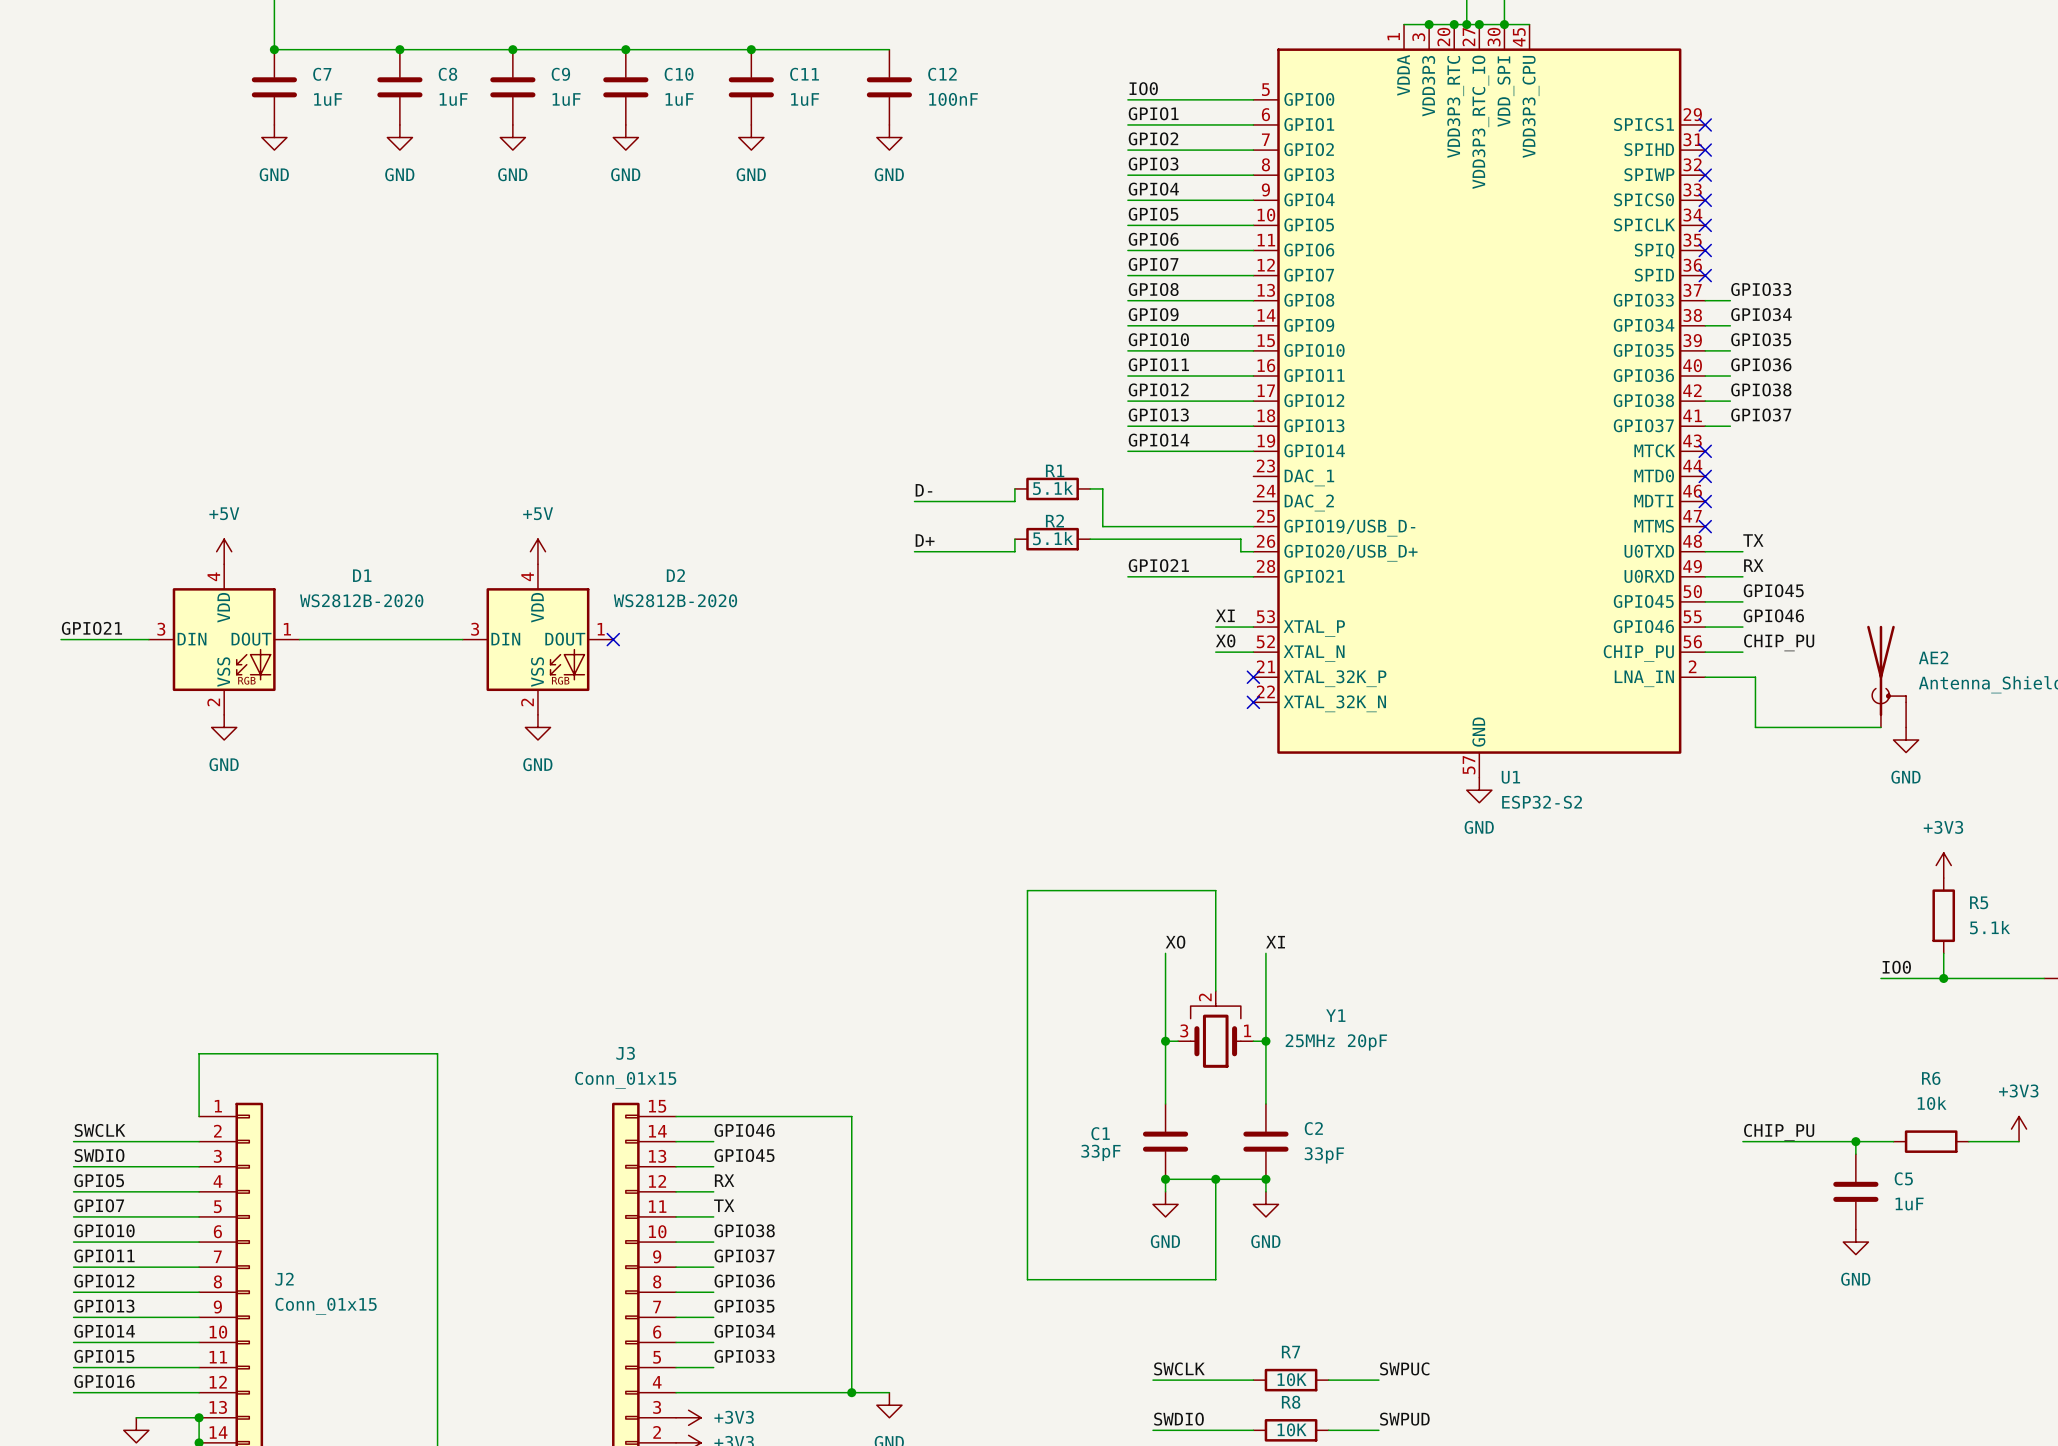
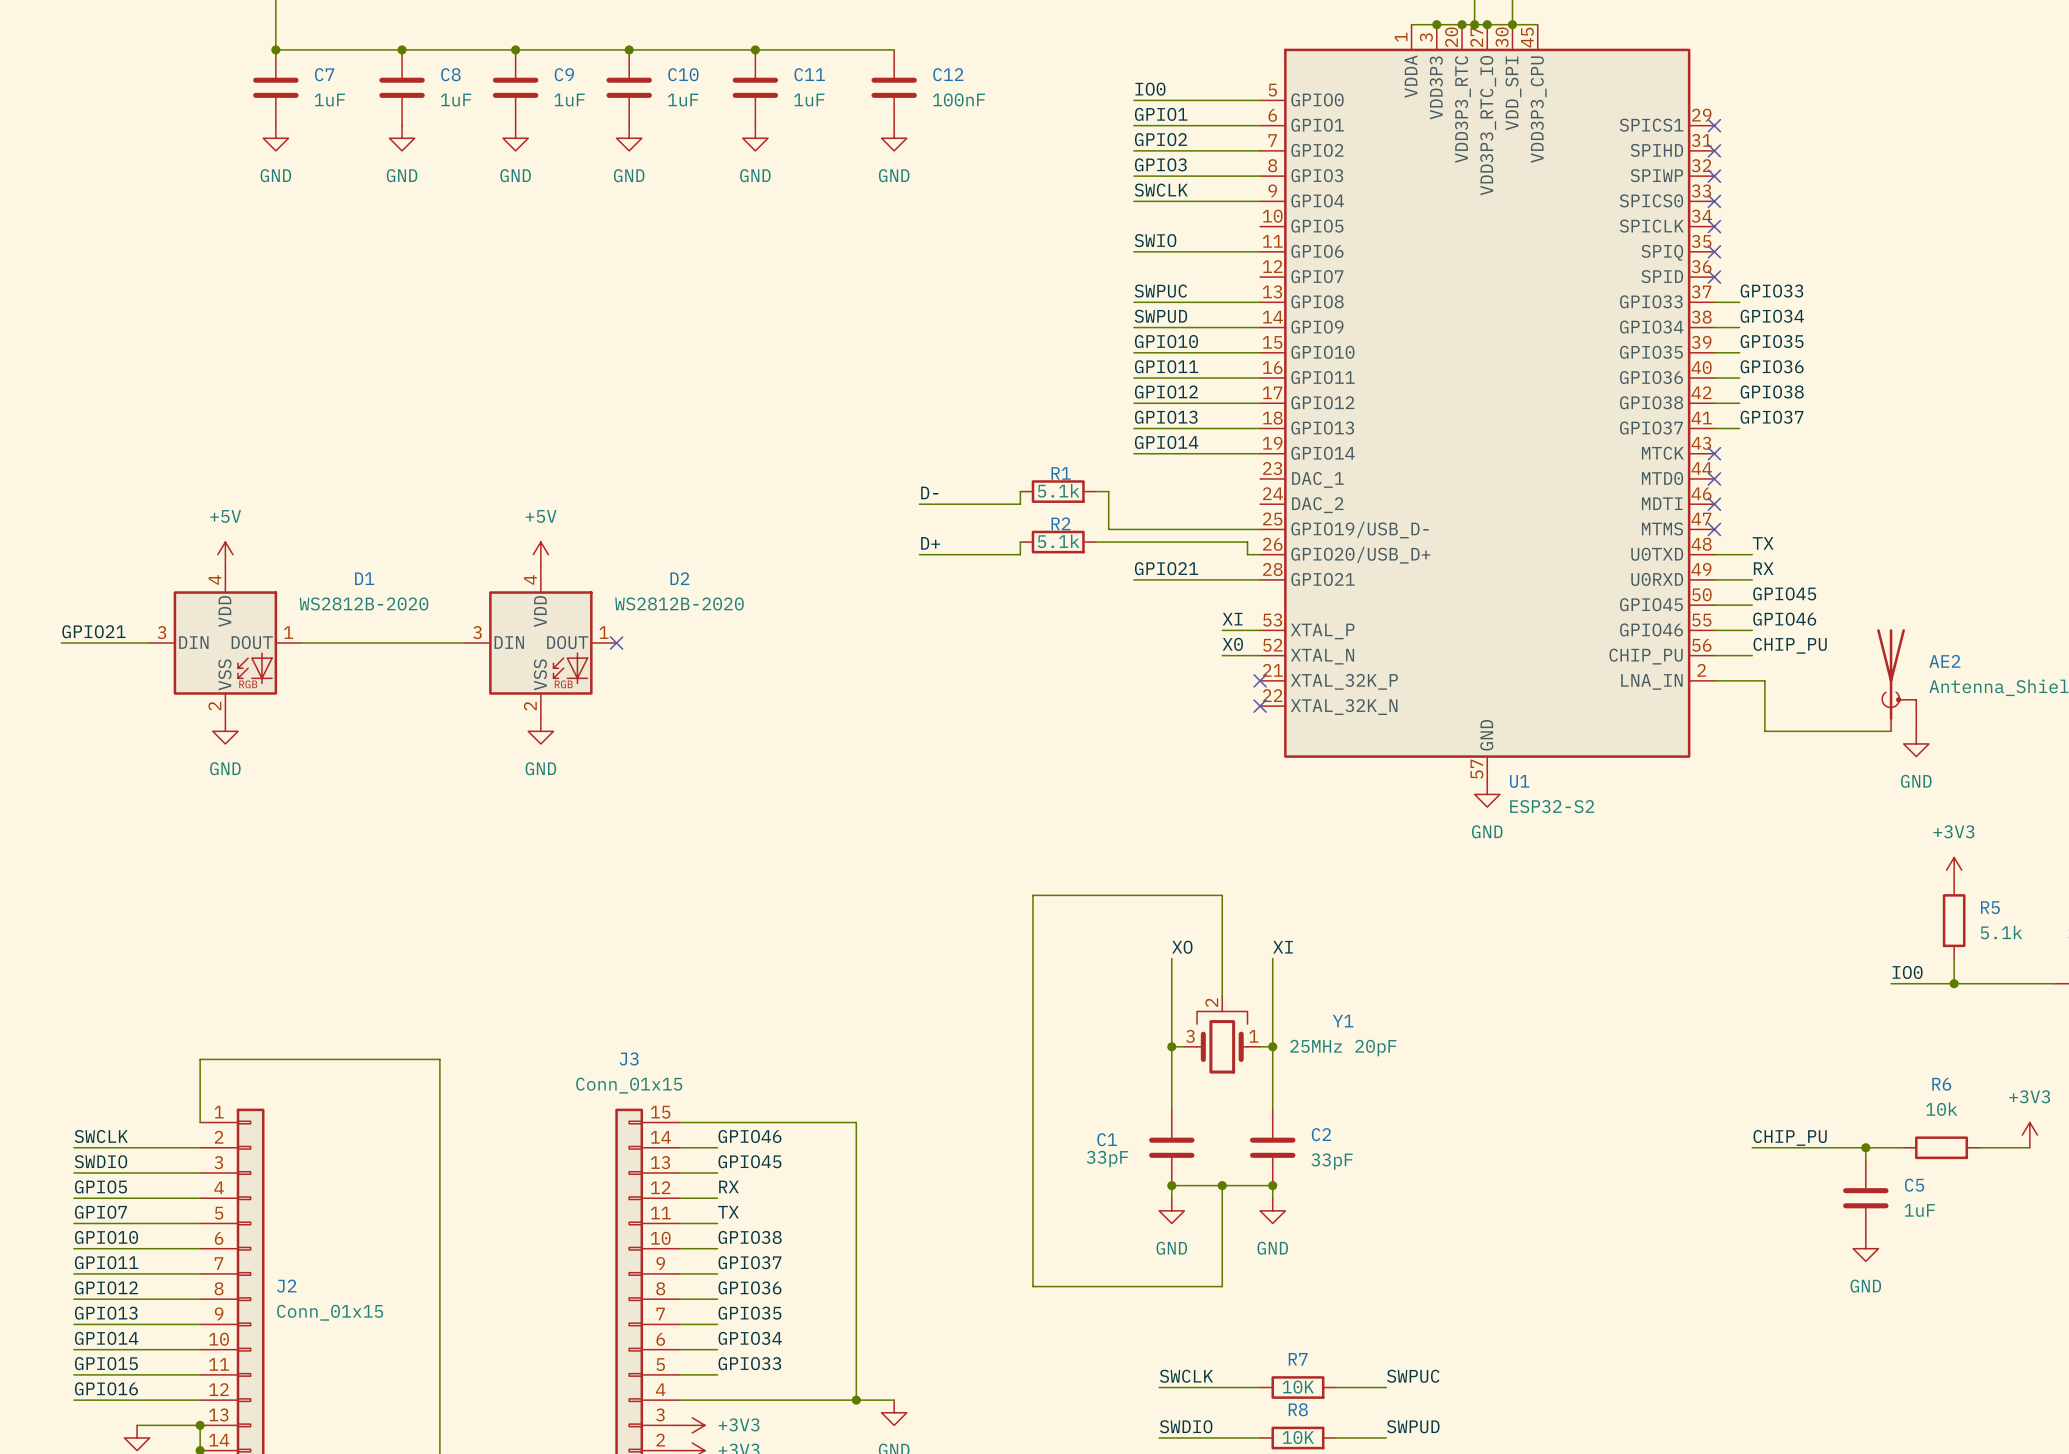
label: GPIO4 (1153, 189) -> SWCLK (1161, 190)
label: GPIO5 (1153, 214) -> none
wire: (1127, 225) (1253, 225) -> none
label: GPIO6 (1153, 239) -> SWIO (1155, 240)
label: GPIO7 (1153, 264) -> none
wire: (1127, 275) (1253, 275) -> none
label: GPIO8 (1153, 289) -> SWPUC (1160, 291)
label: GPIO9 (1153, 314) -> SWPUD (1160, 316)

